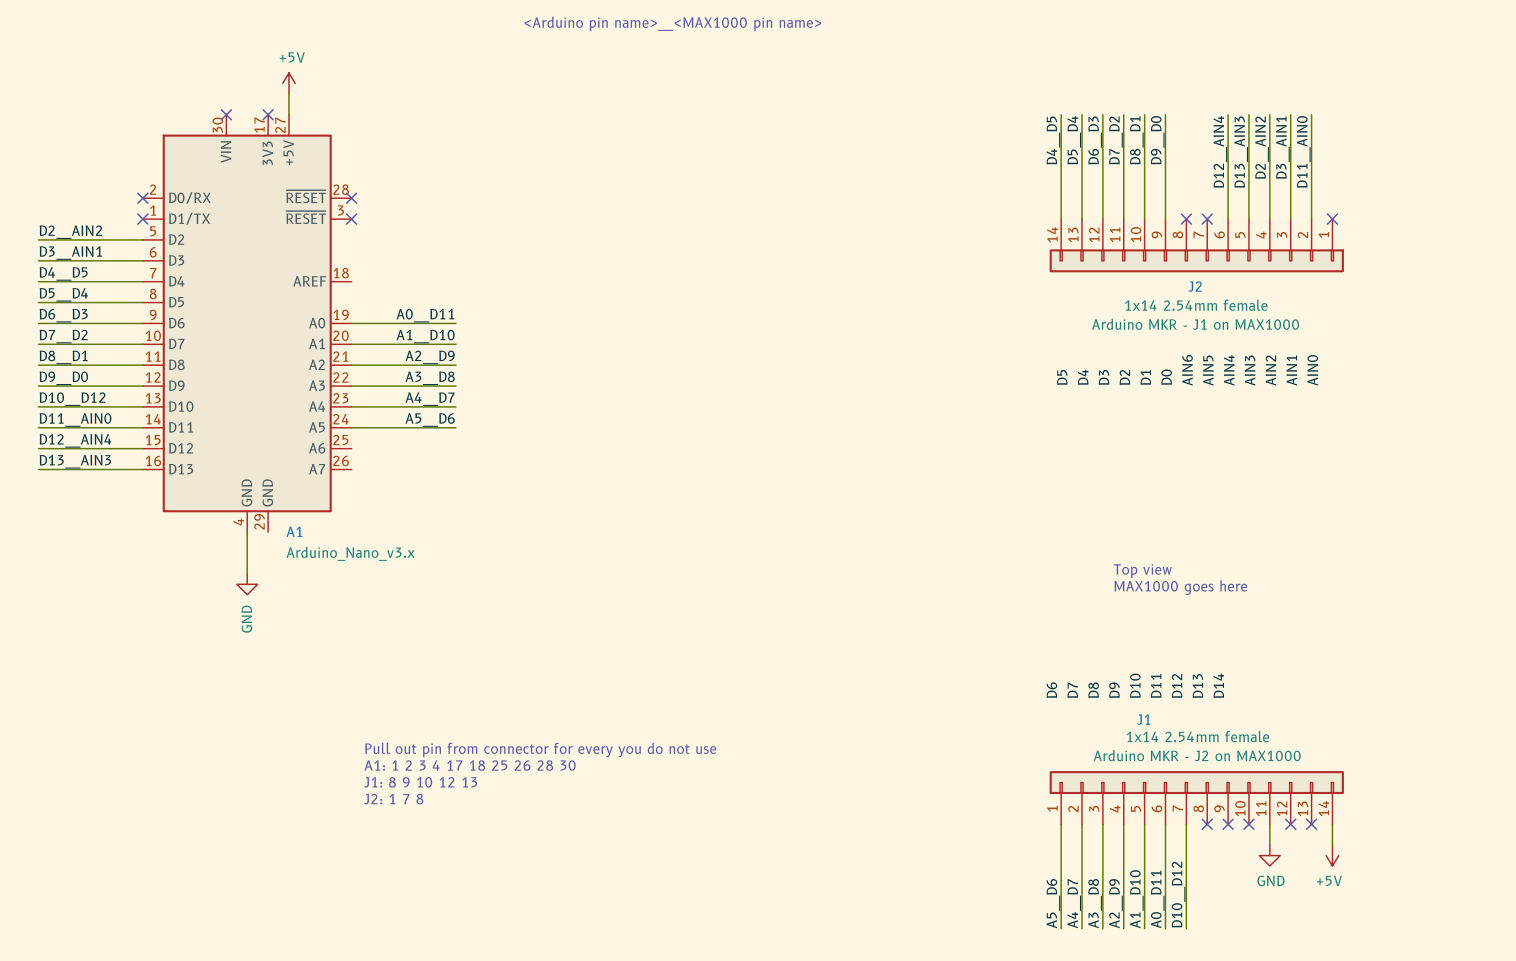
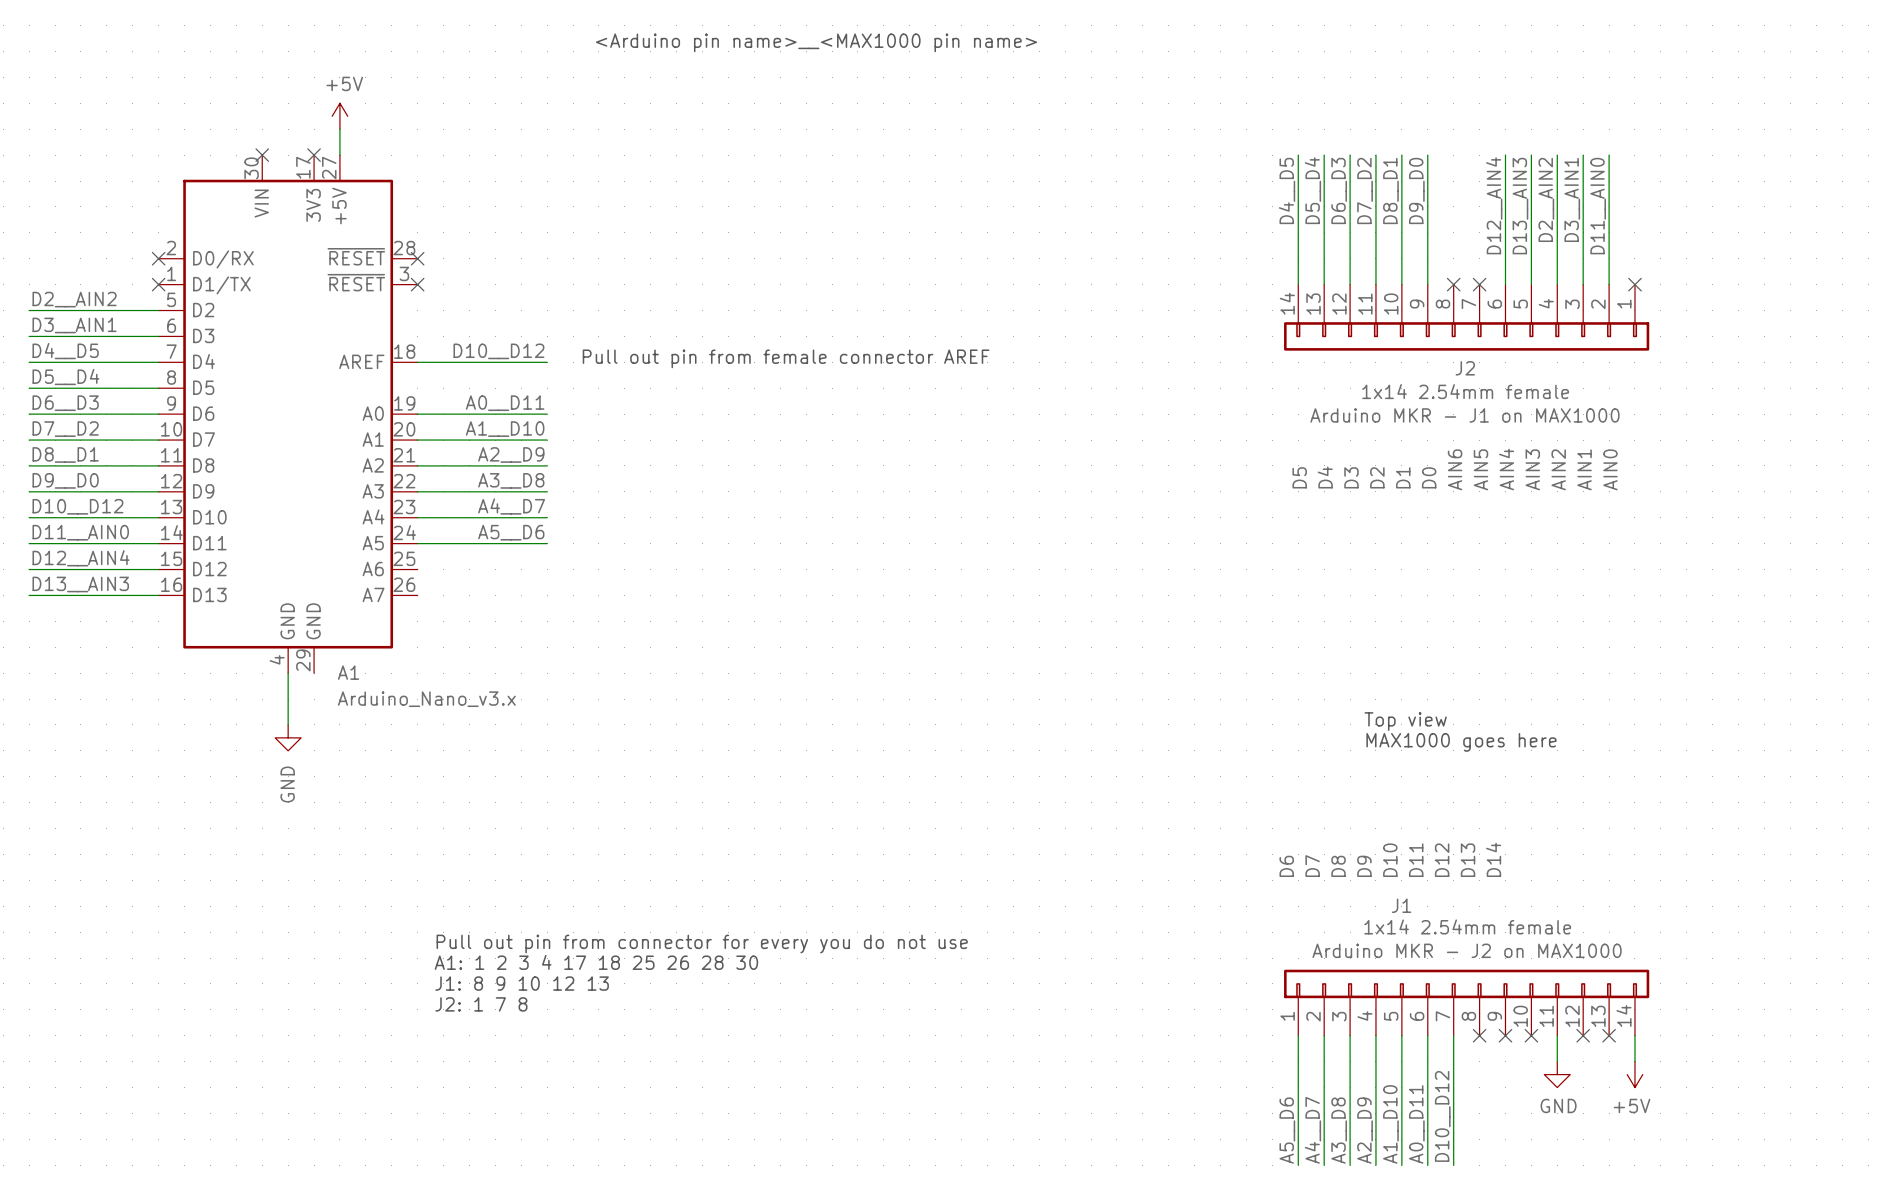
label: none -> D10__D12 (498, 351)
text: none -> Pull out pin from female connector AREF (786, 358)
wire: none -> (417, 362) (547, 362)

